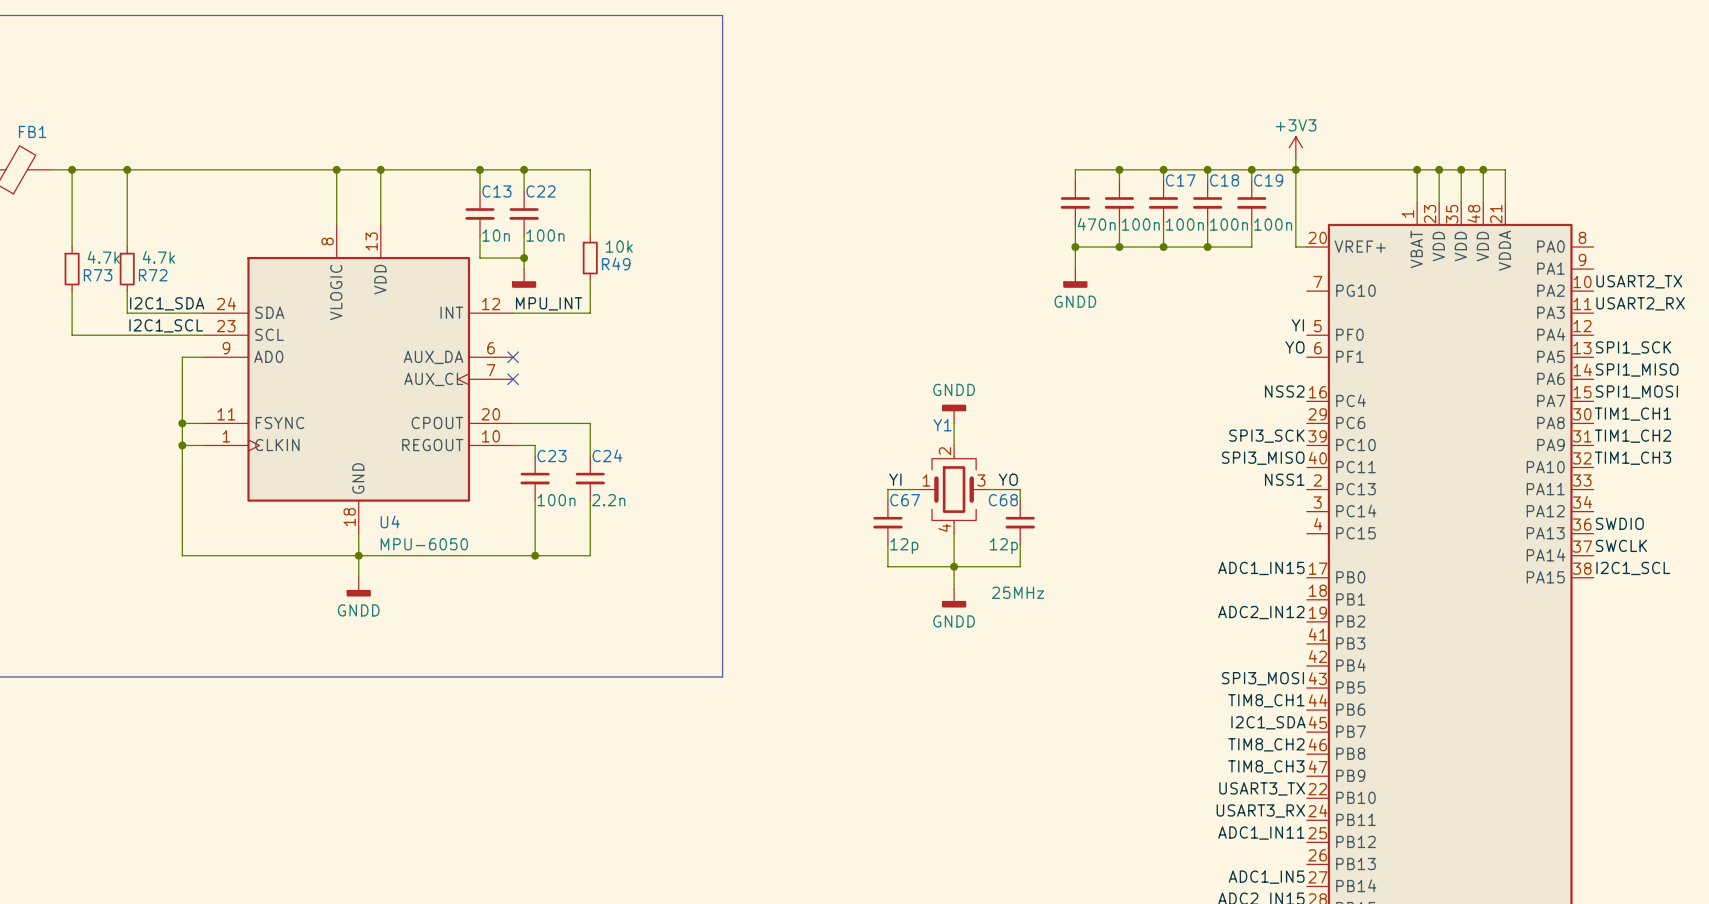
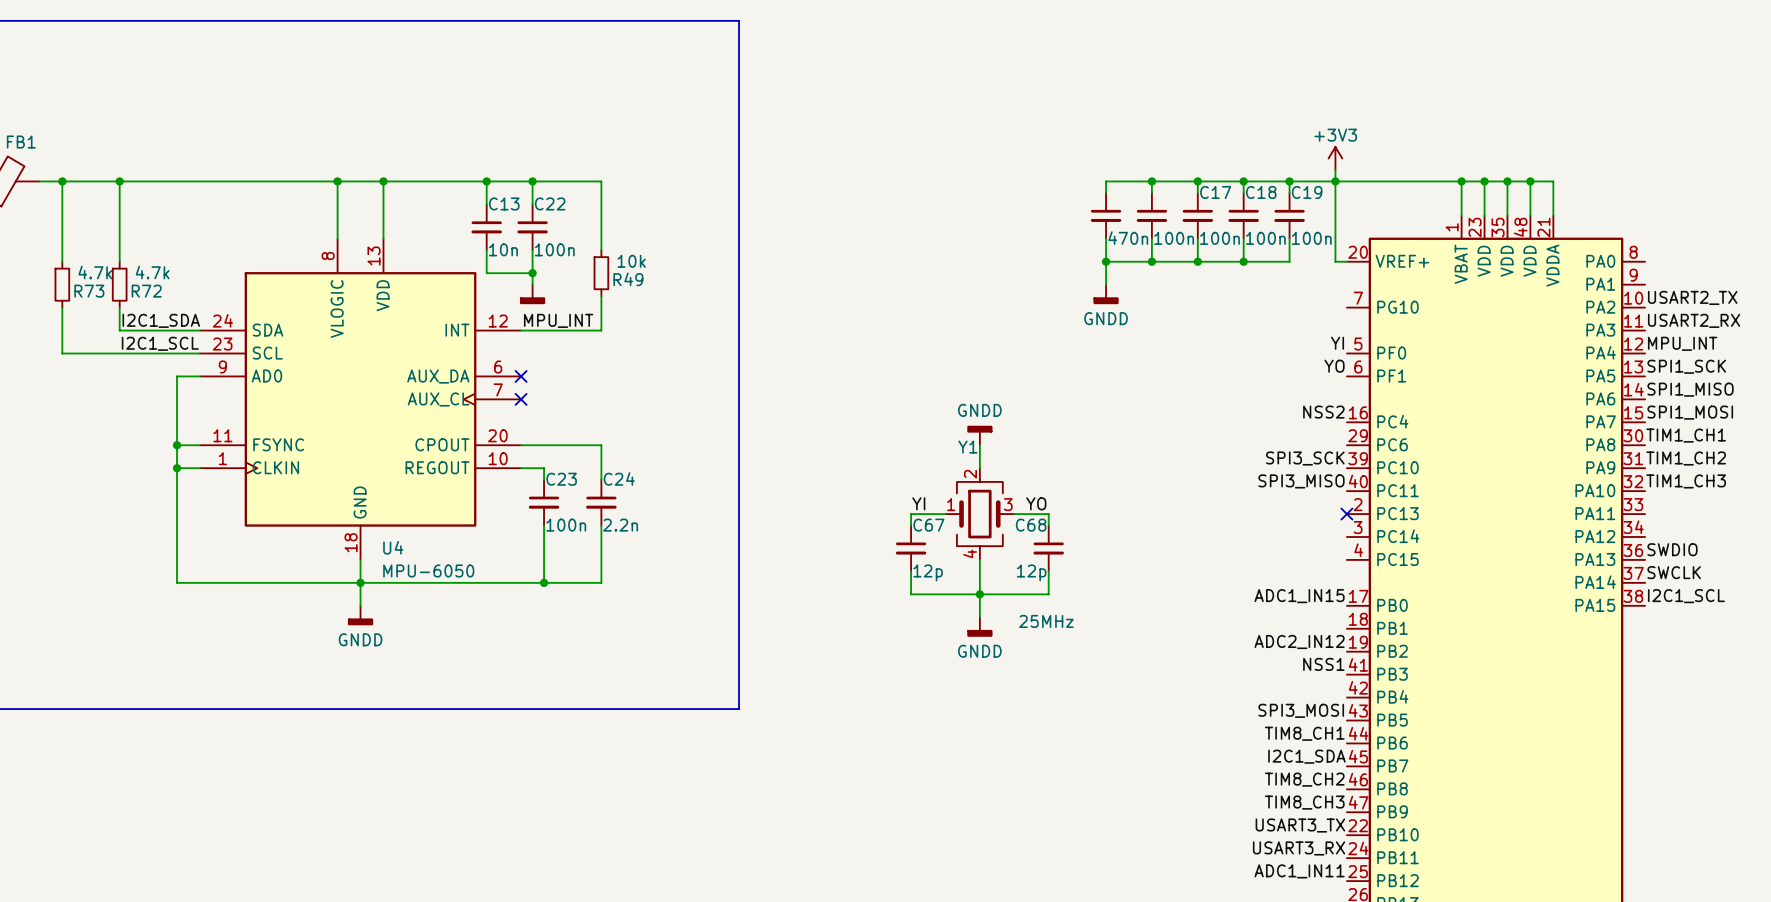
label: none -> MPU_INT (1682, 343)
label position: NSS1 (1284, 479) -> NSS1 (1323, 664)
no-connect mark: none -> (1346, 514)

